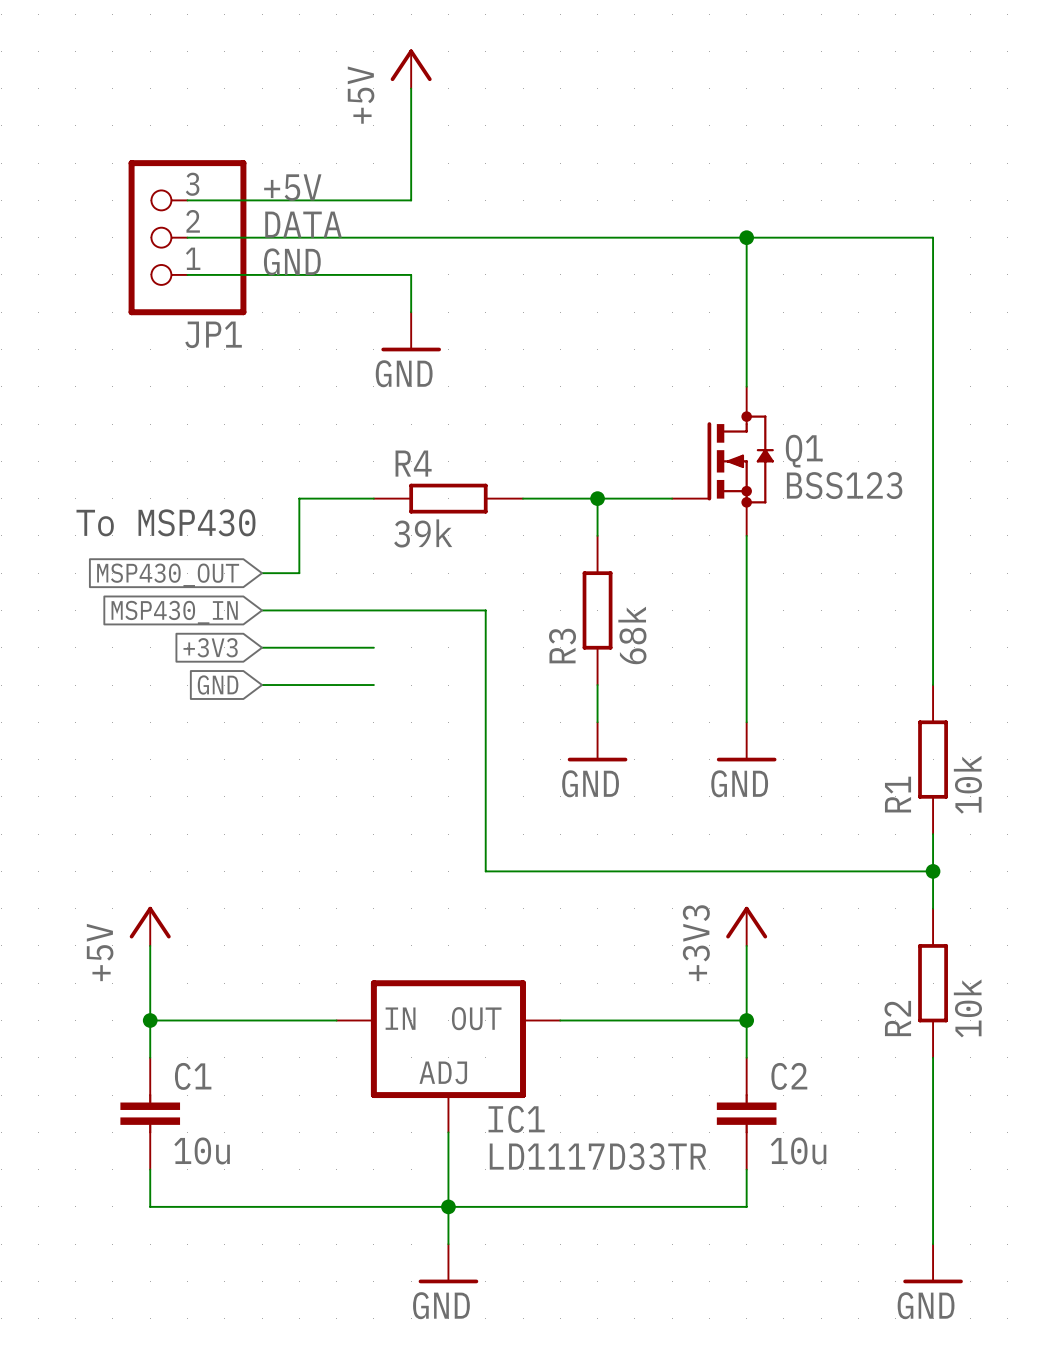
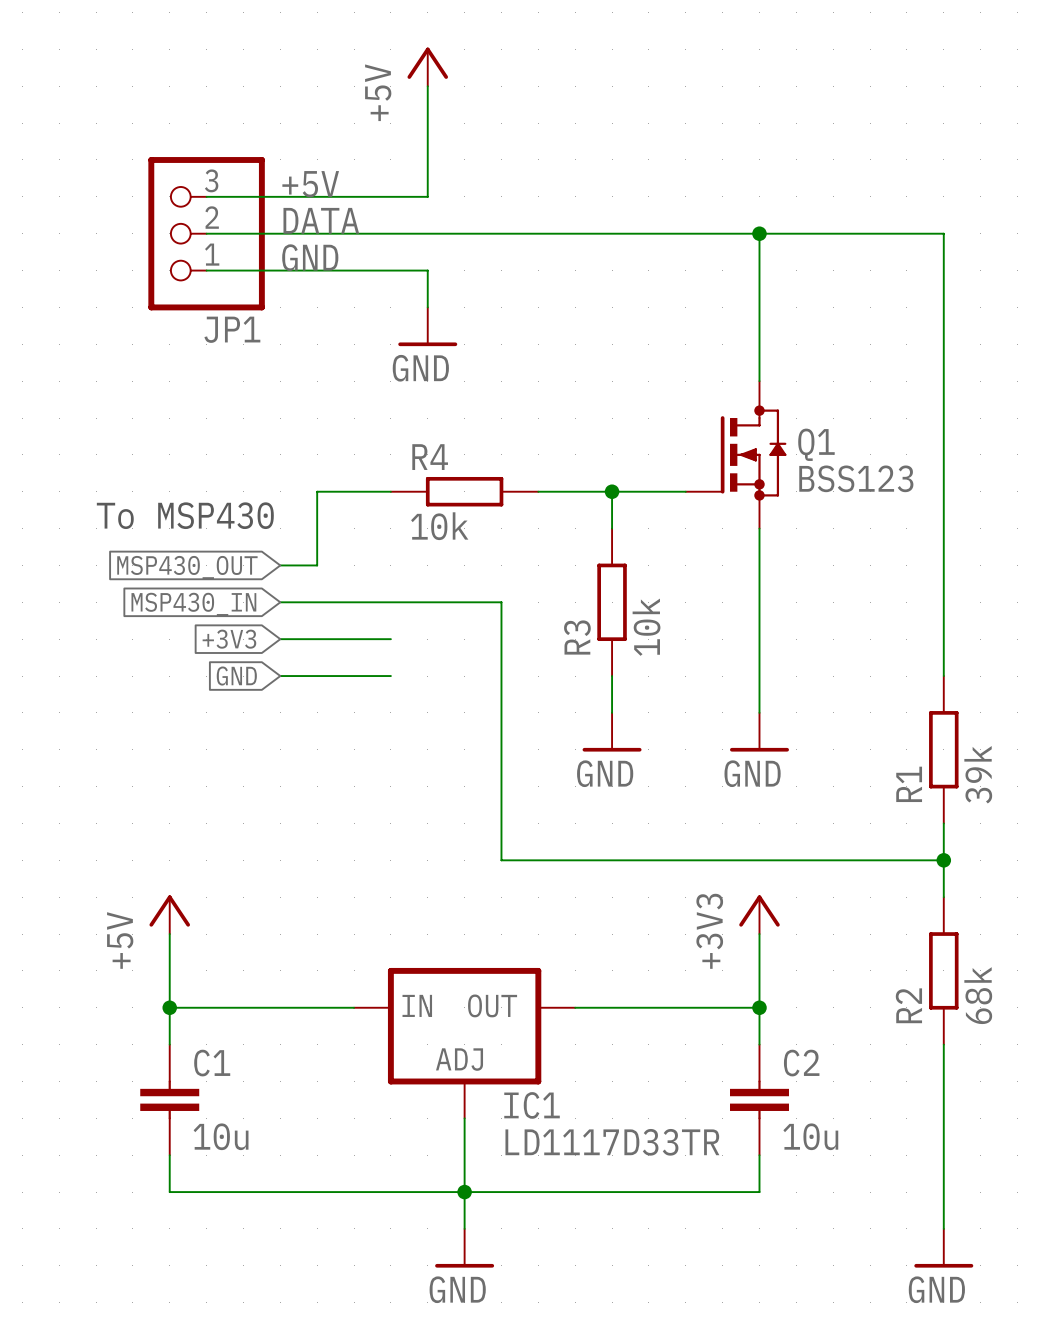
R4 value: 39k (423, 533) -> 10k (439, 526)
R3 value: 68k (632, 635) -> 10k (646, 627)
R1 value: 10k (967, 784) -> 39k (978, 774)
R2 value: 10k (967, 1008) -> 68k (978, 995)

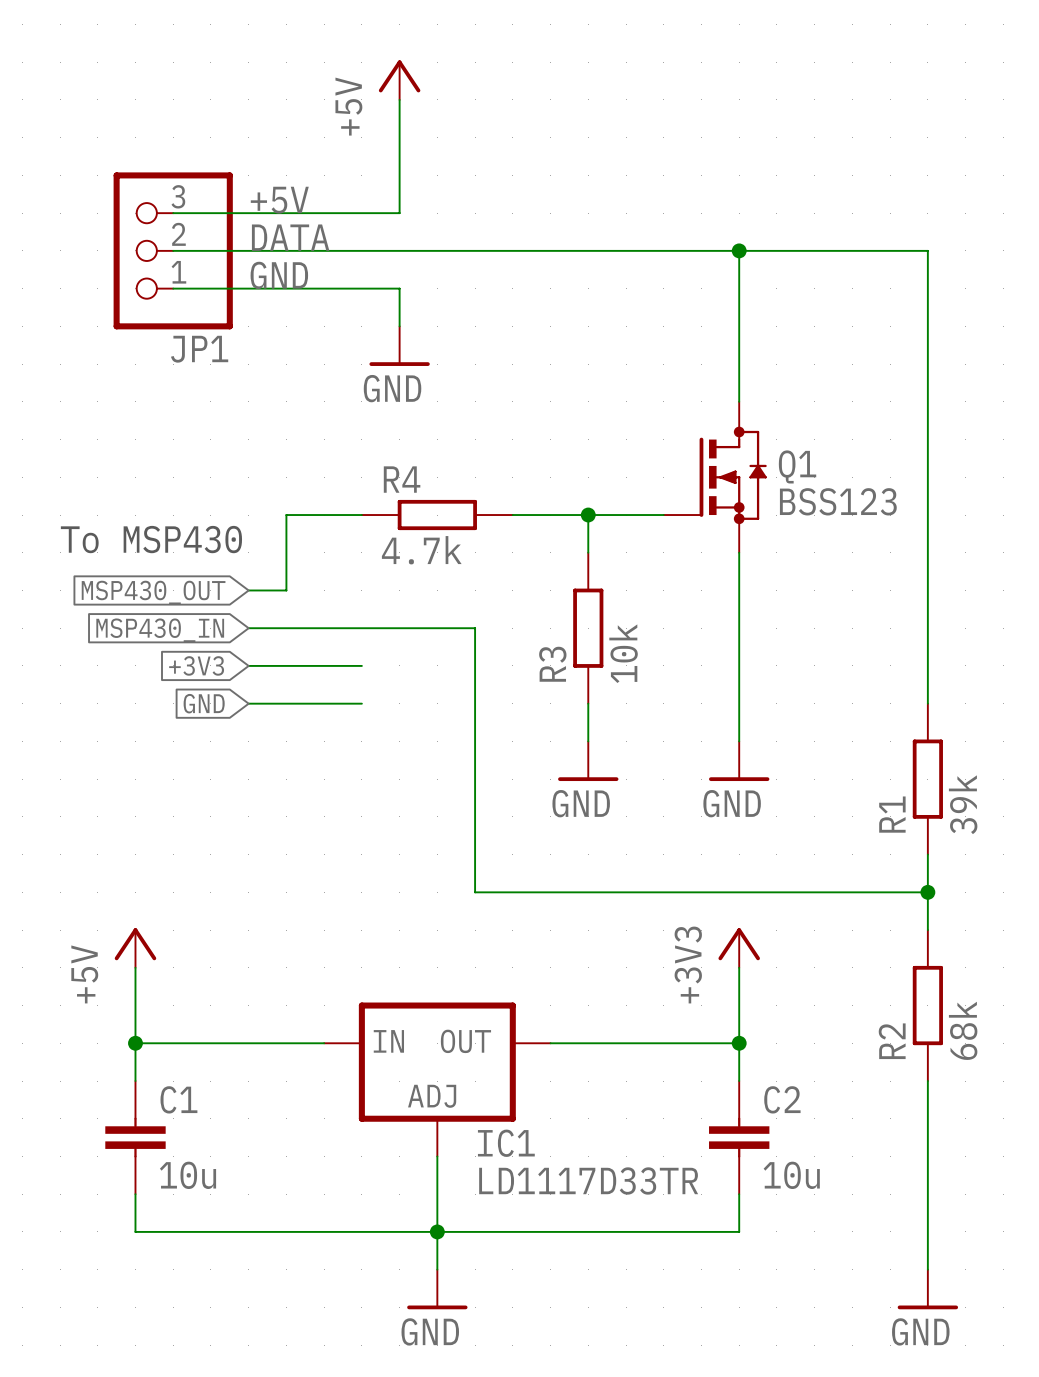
R4 value: 10k (439, 526) -> 4.7k (421, 550)

